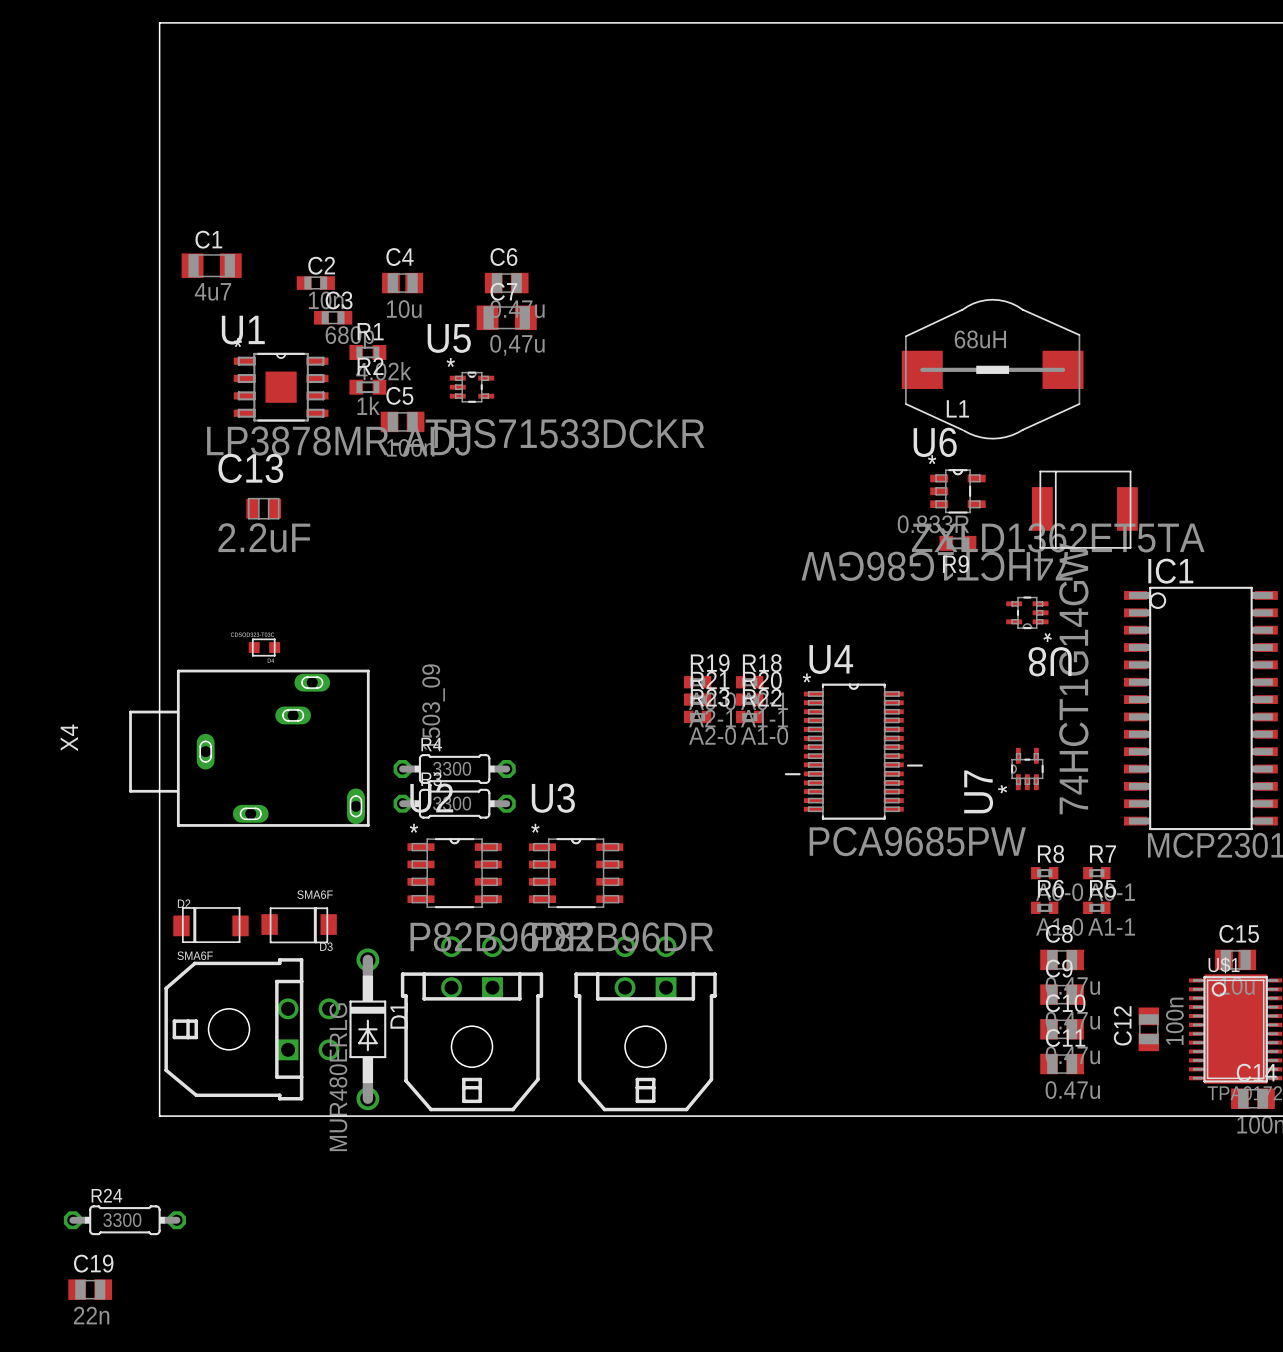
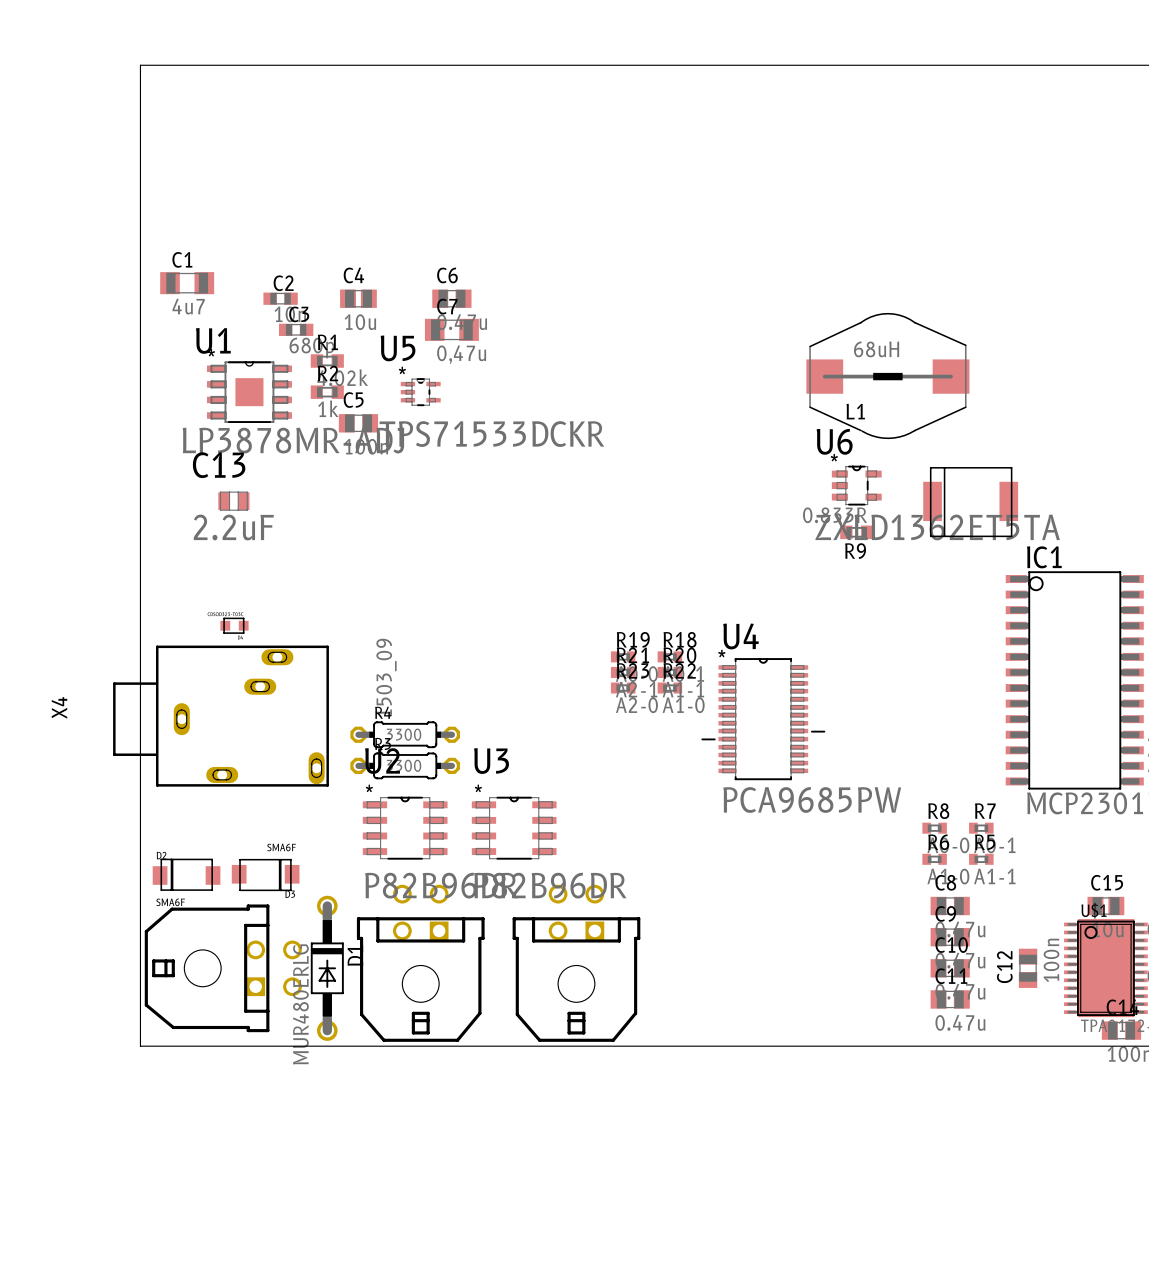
U8: 74HCT1G86GW (1027, 612) -> none
U7: 74HCT1G14GW (1027, 769) -> none
R24: 3300 (124, 1220) -> none
C19: 22n (90, 1289) -> none

